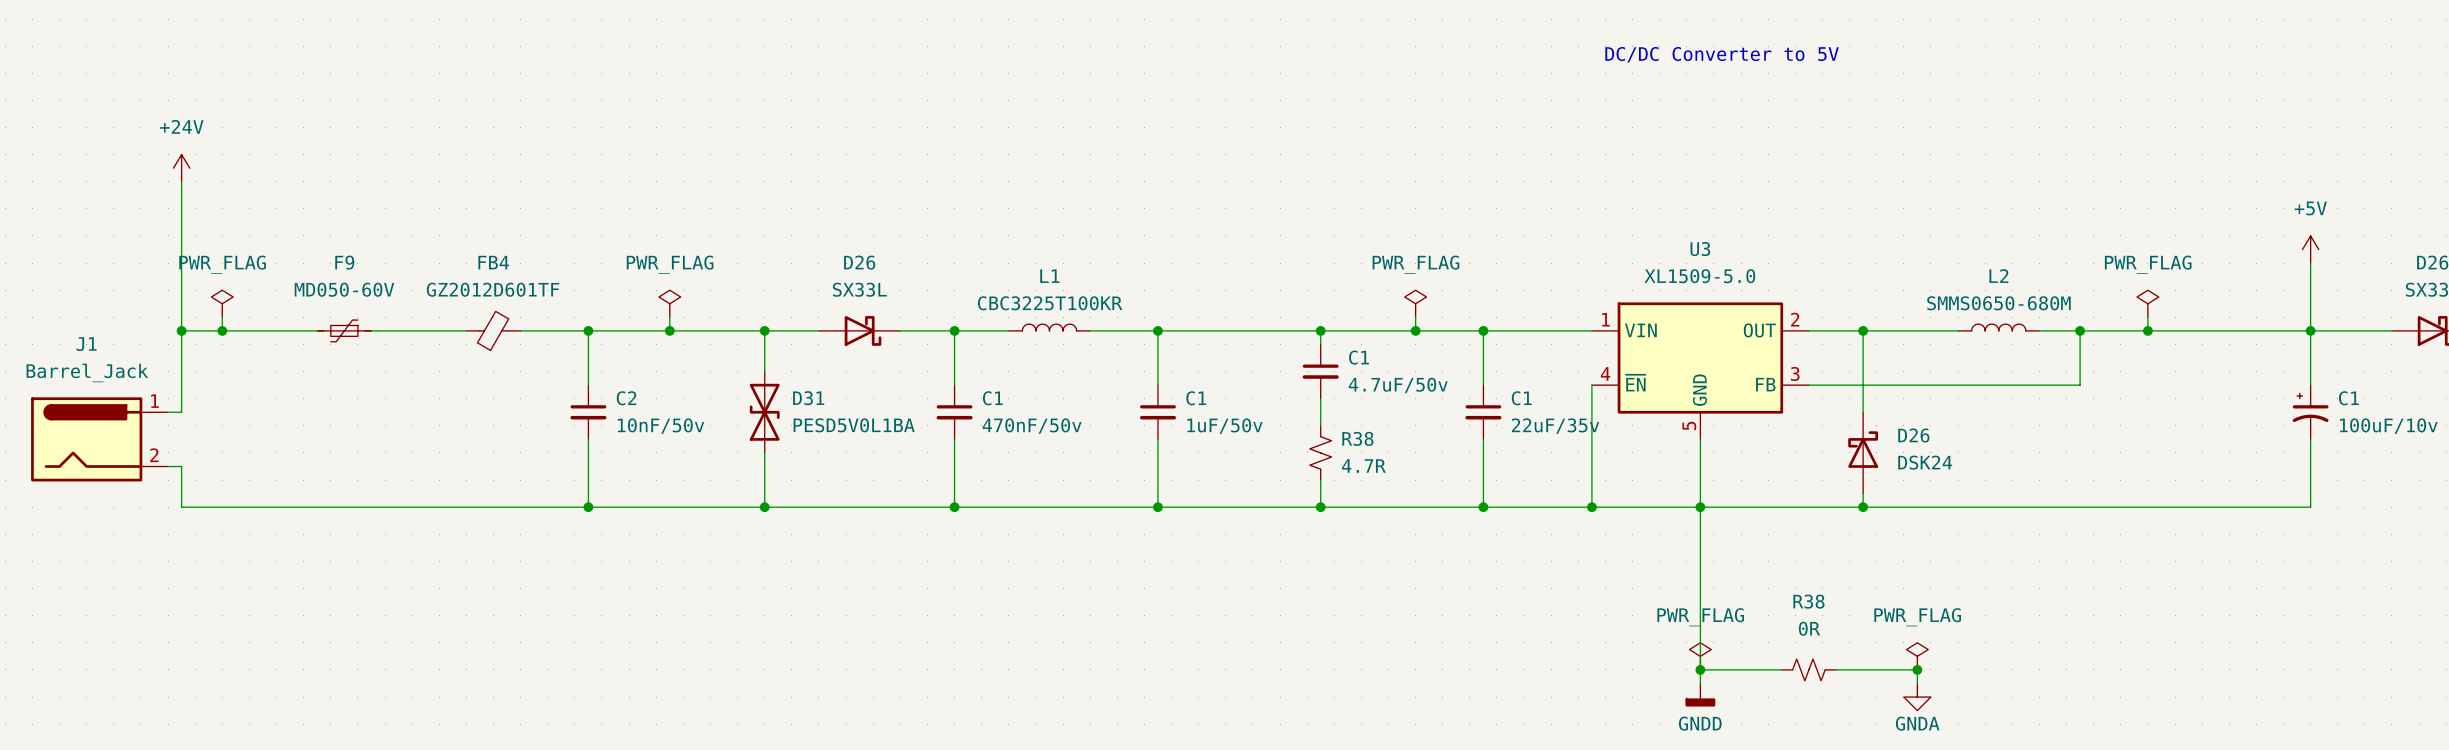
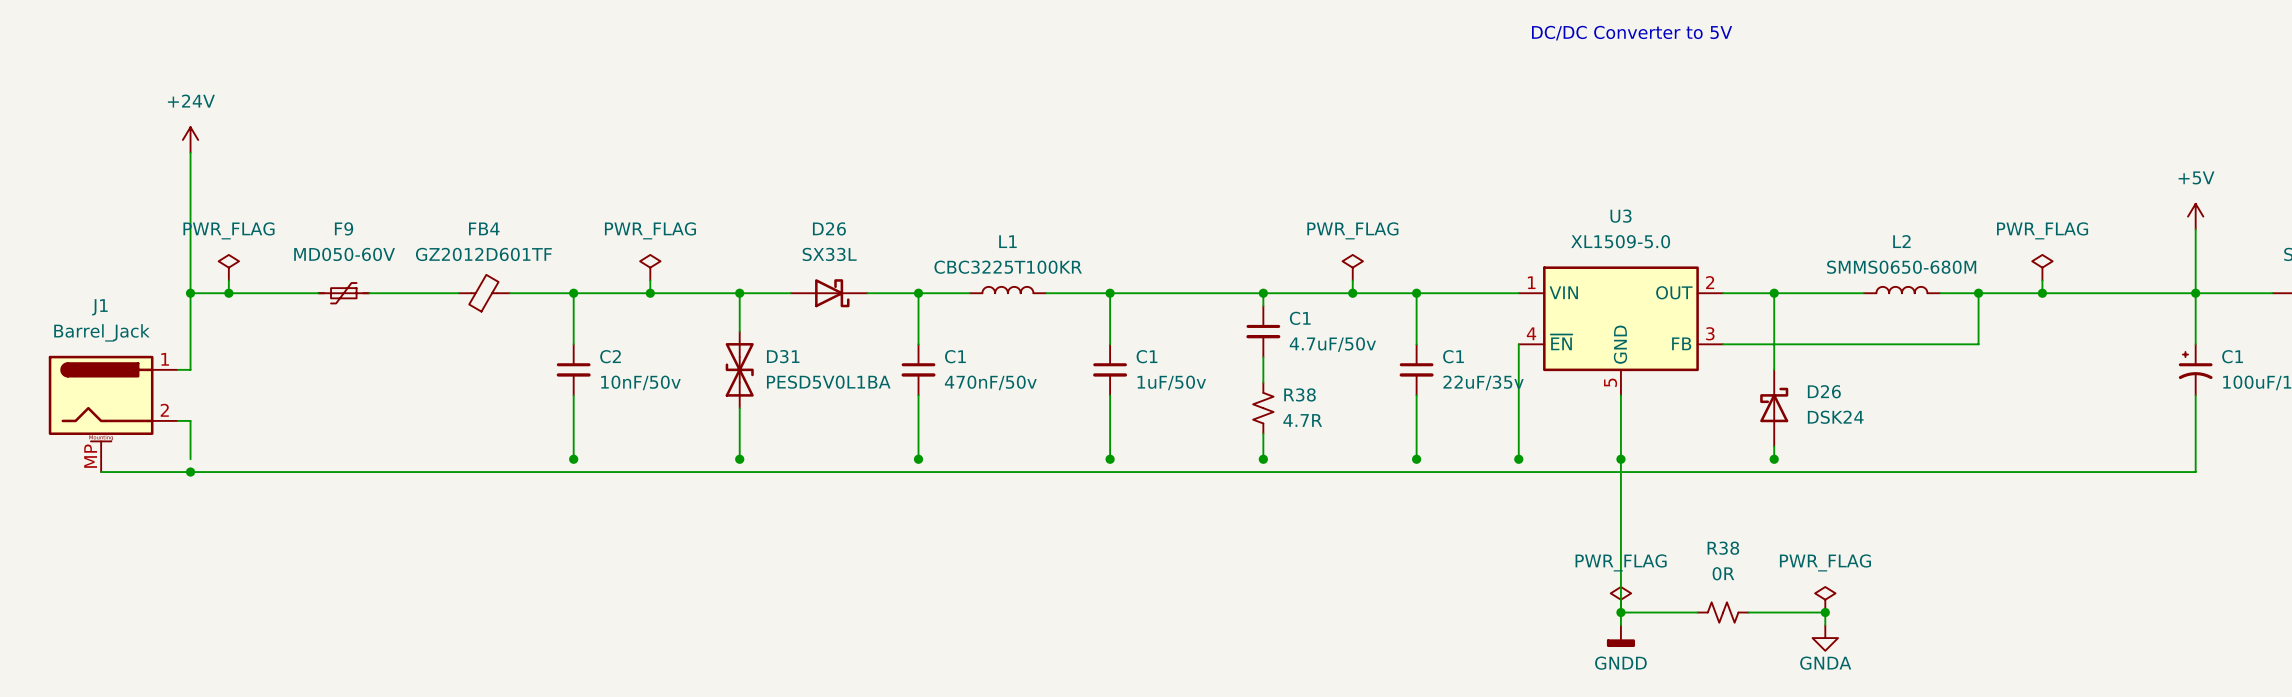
J1 symbol: [31, 397, 169, 482] -> [48, 355, 178, 473]
wire: (181, 507) (2310, 507) -> (101, 472) (2195, 472) (2195, 459)
junction: none -> (190, 472)

